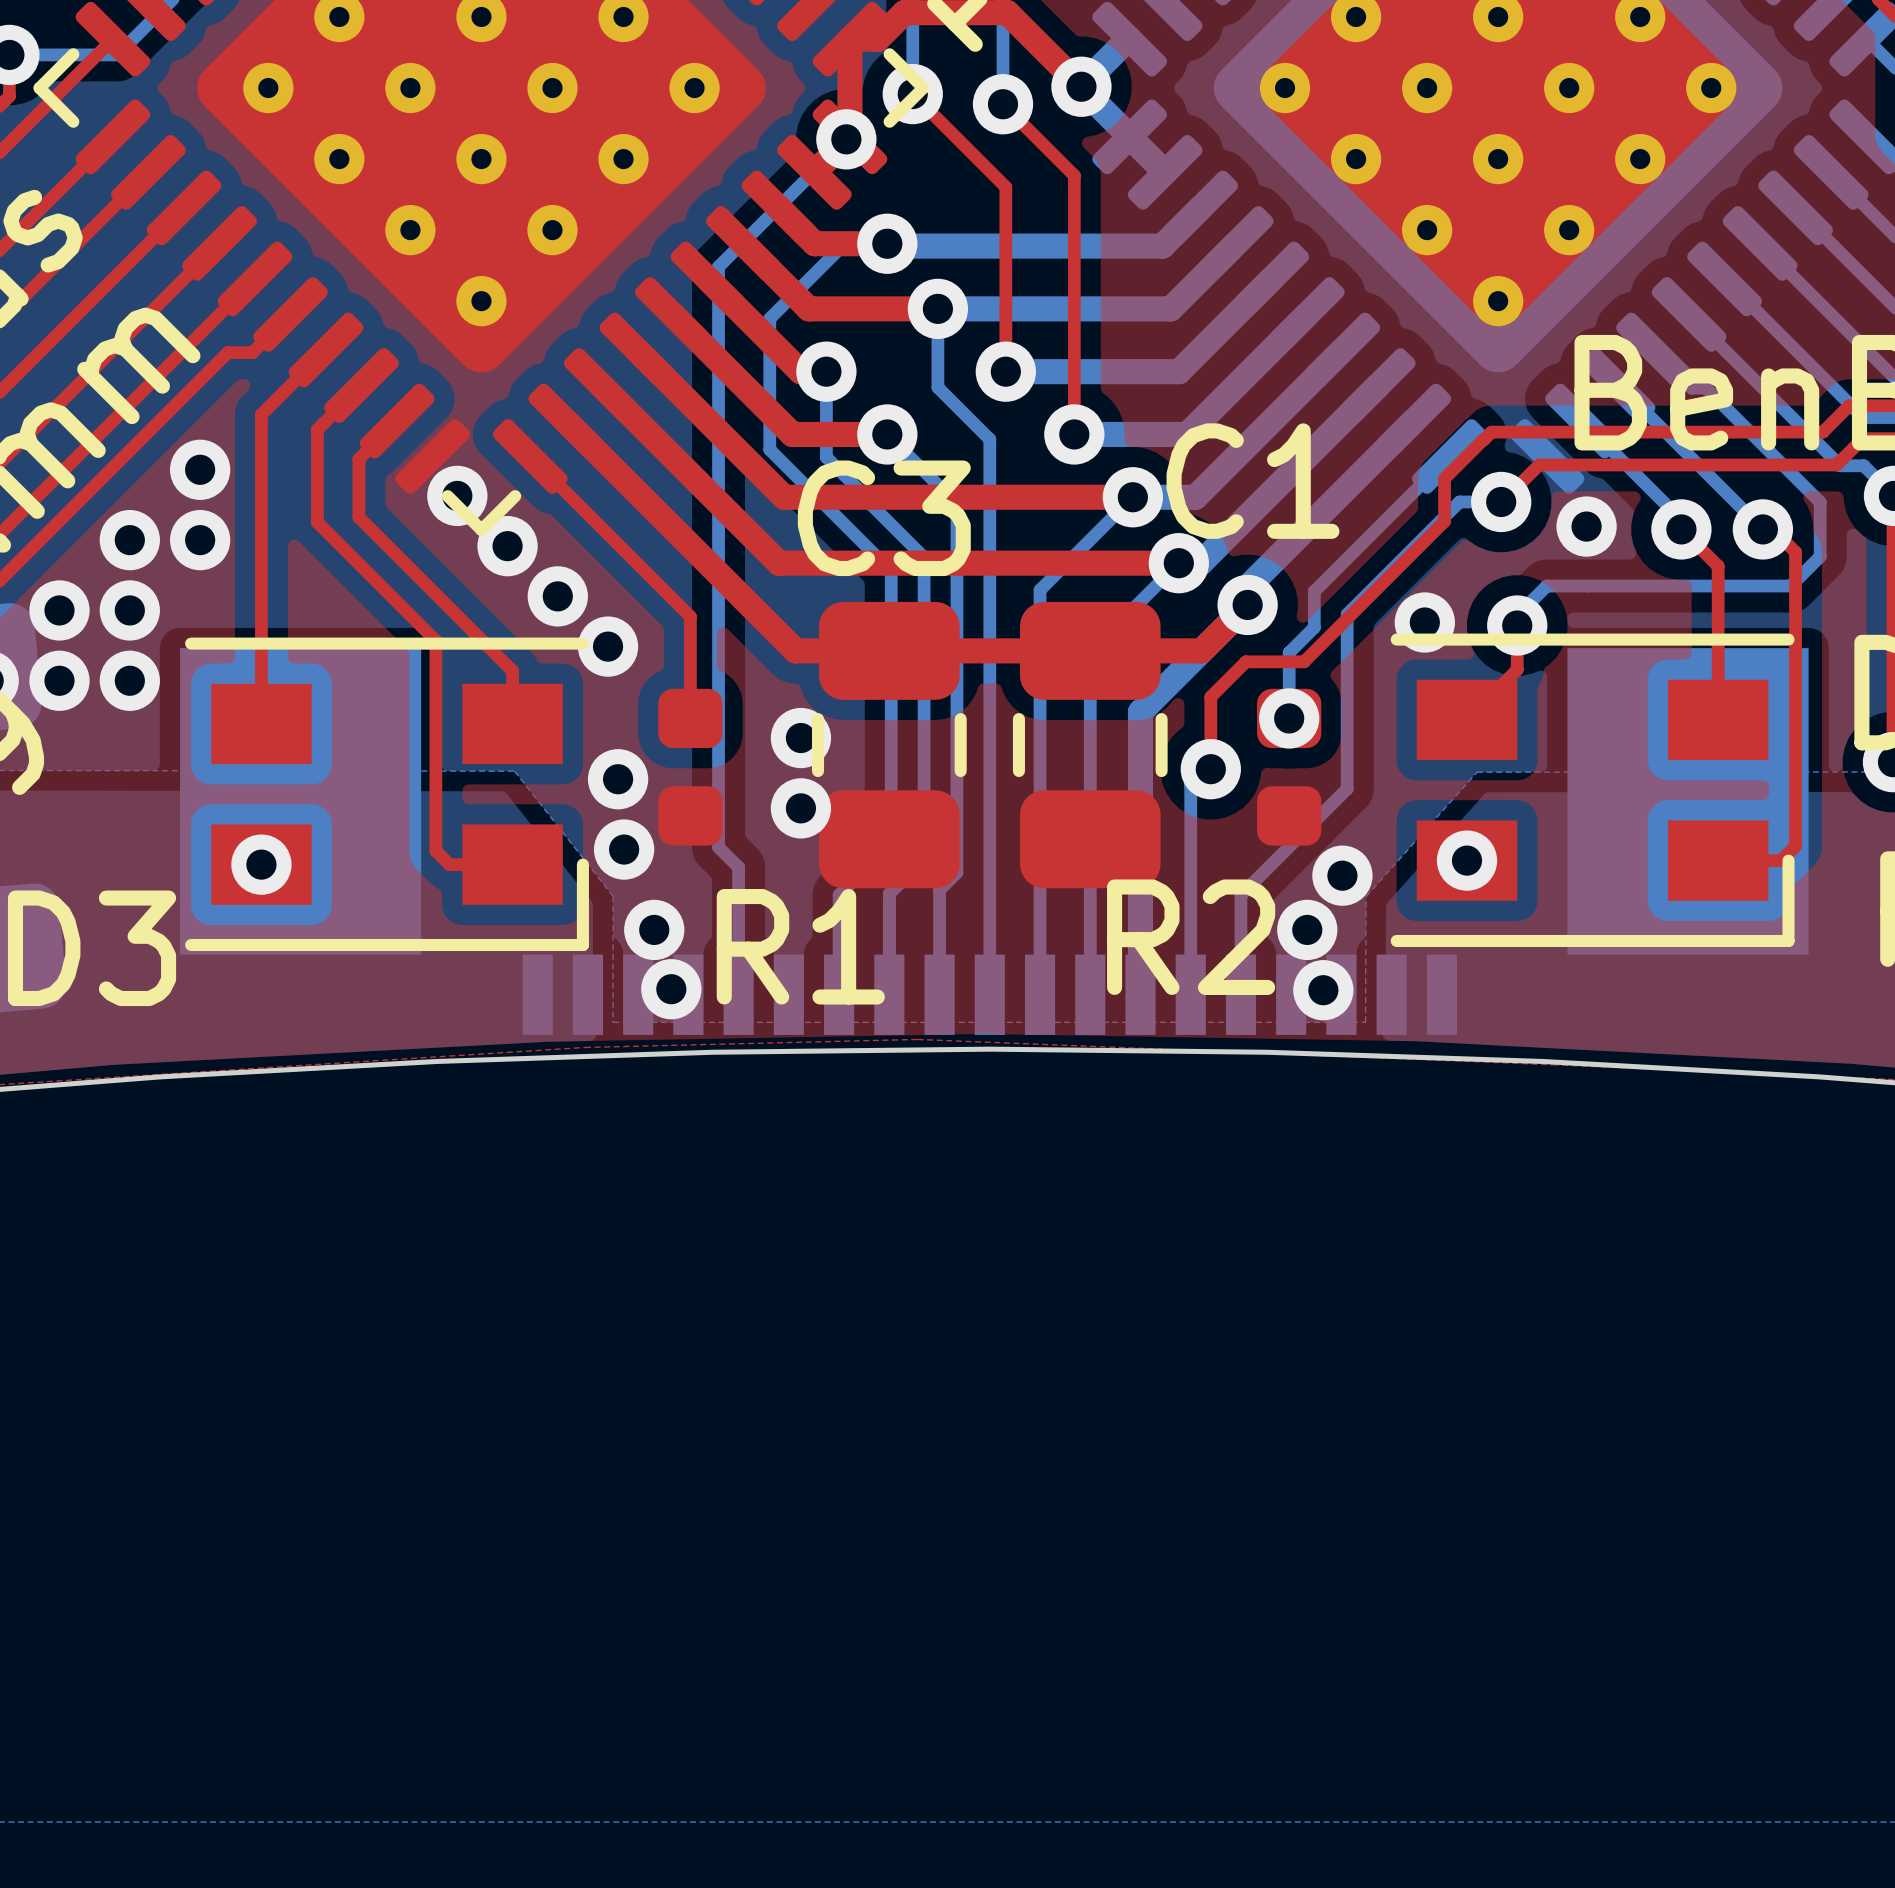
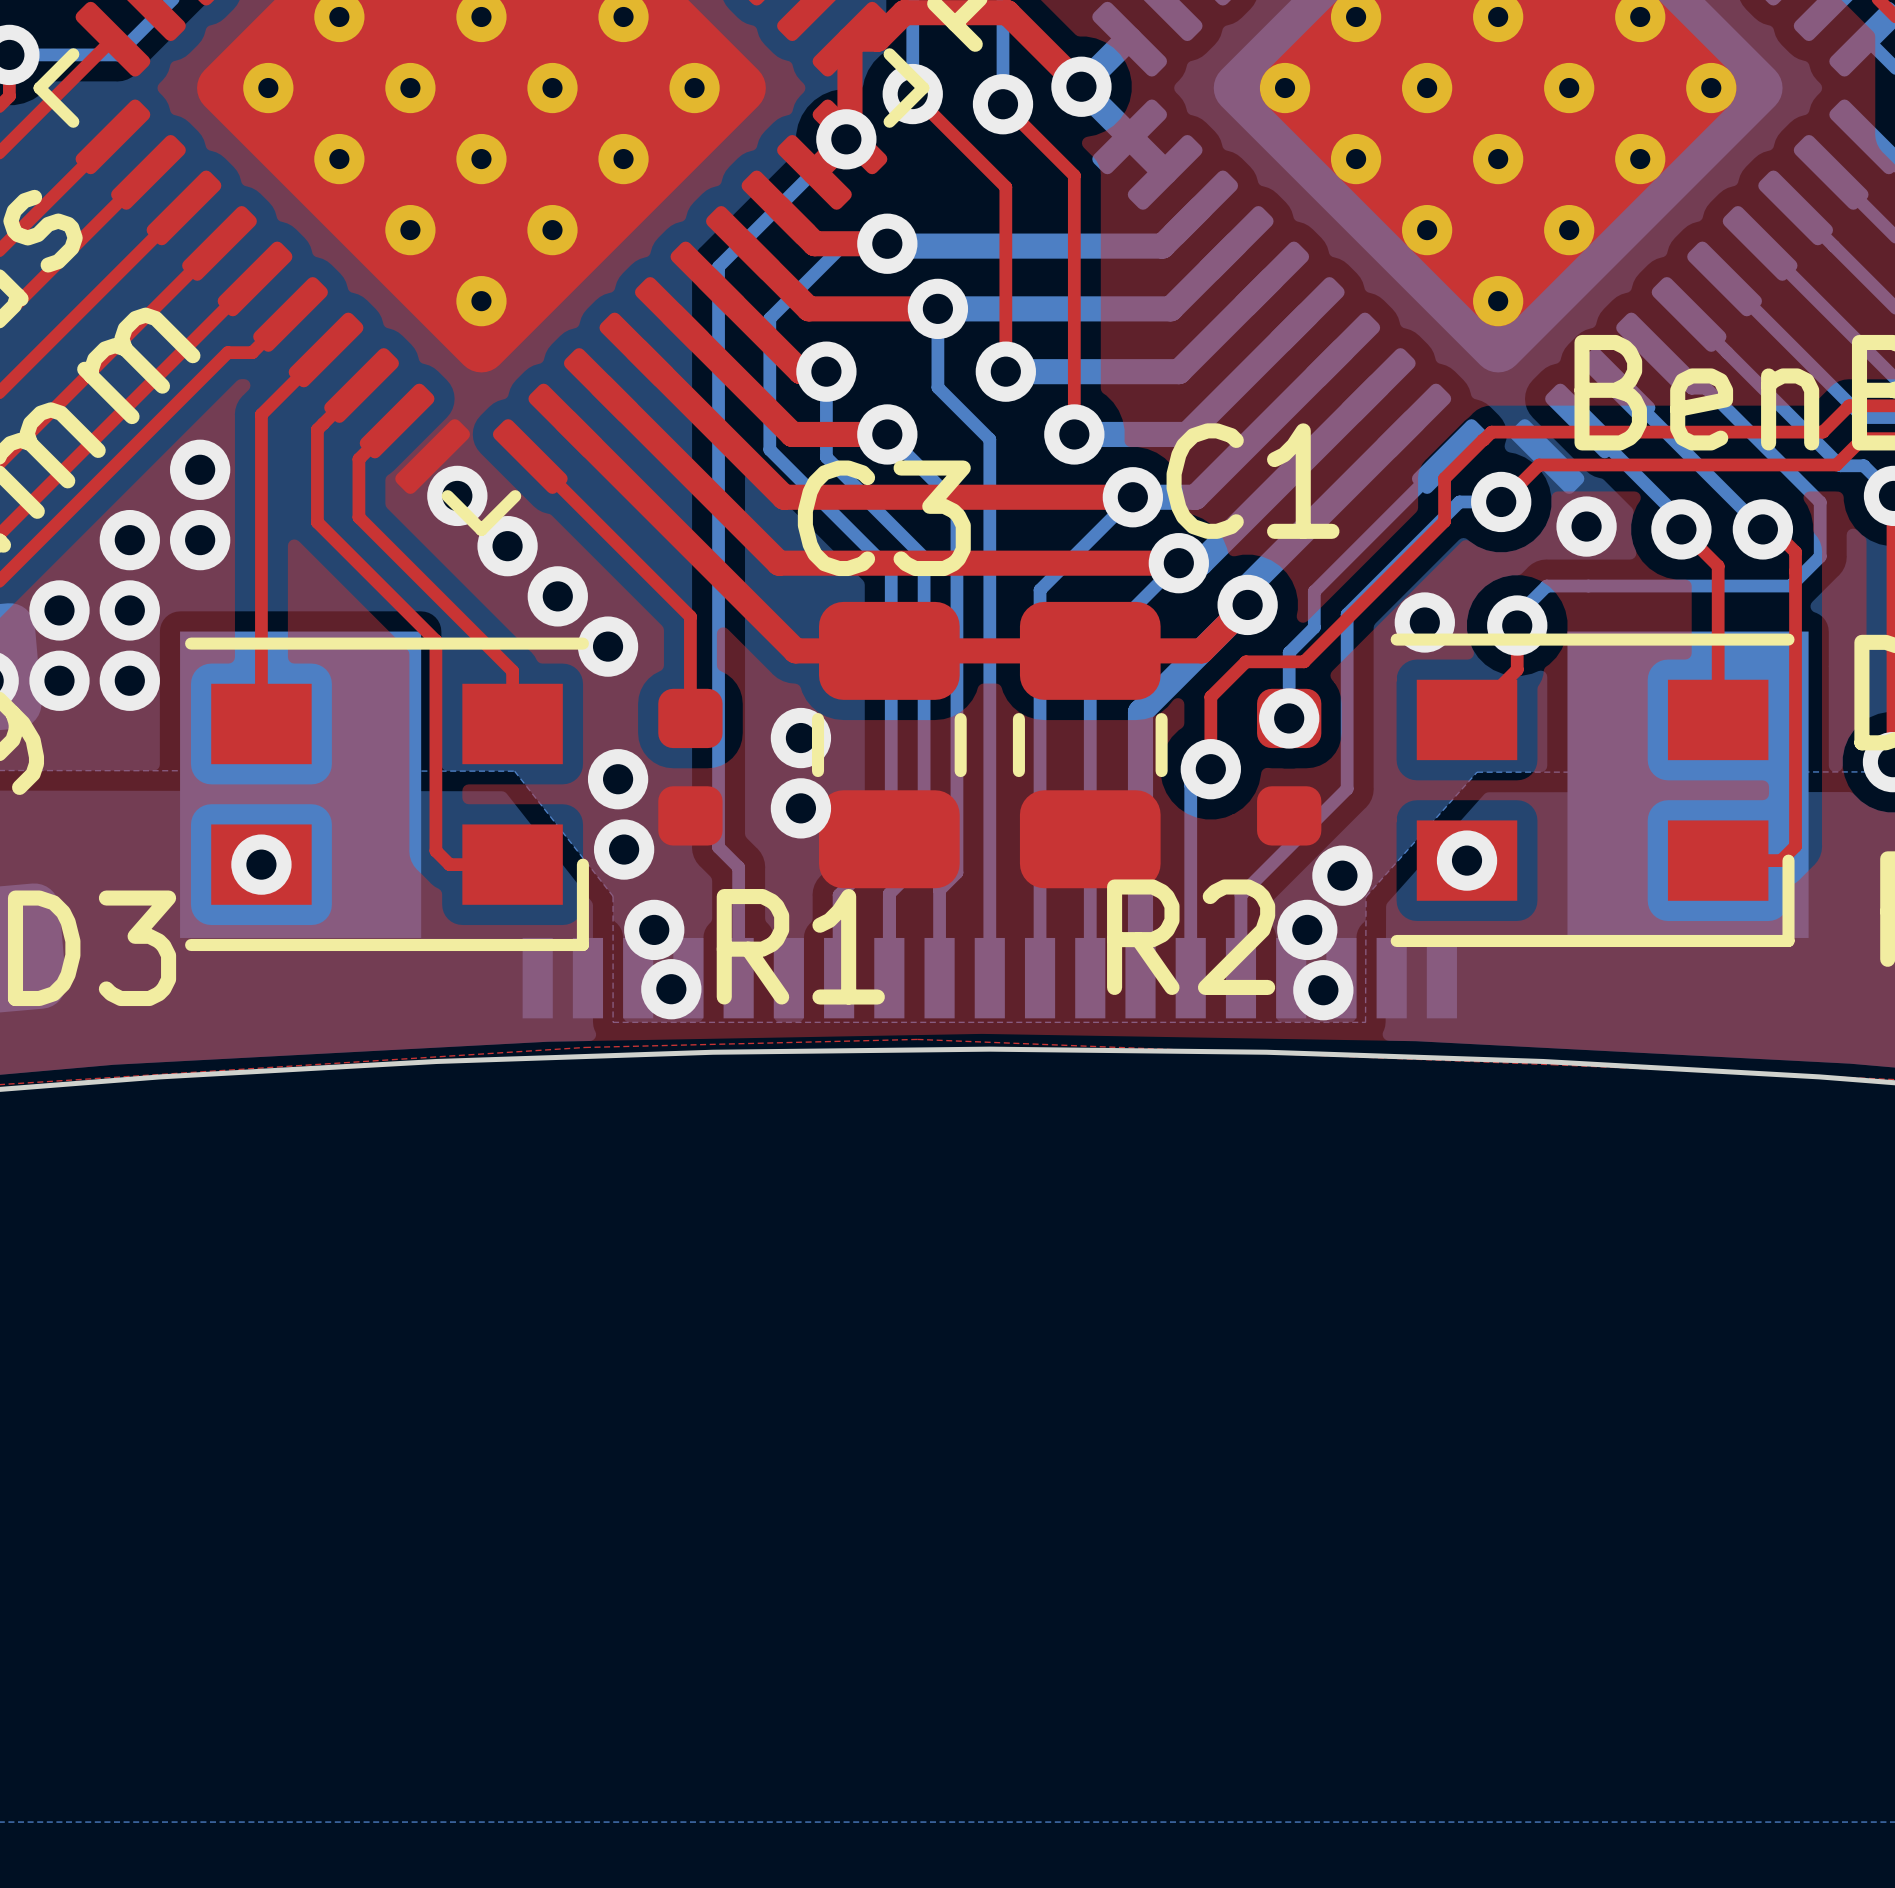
part position: (994, 841) -> (994, 824)

